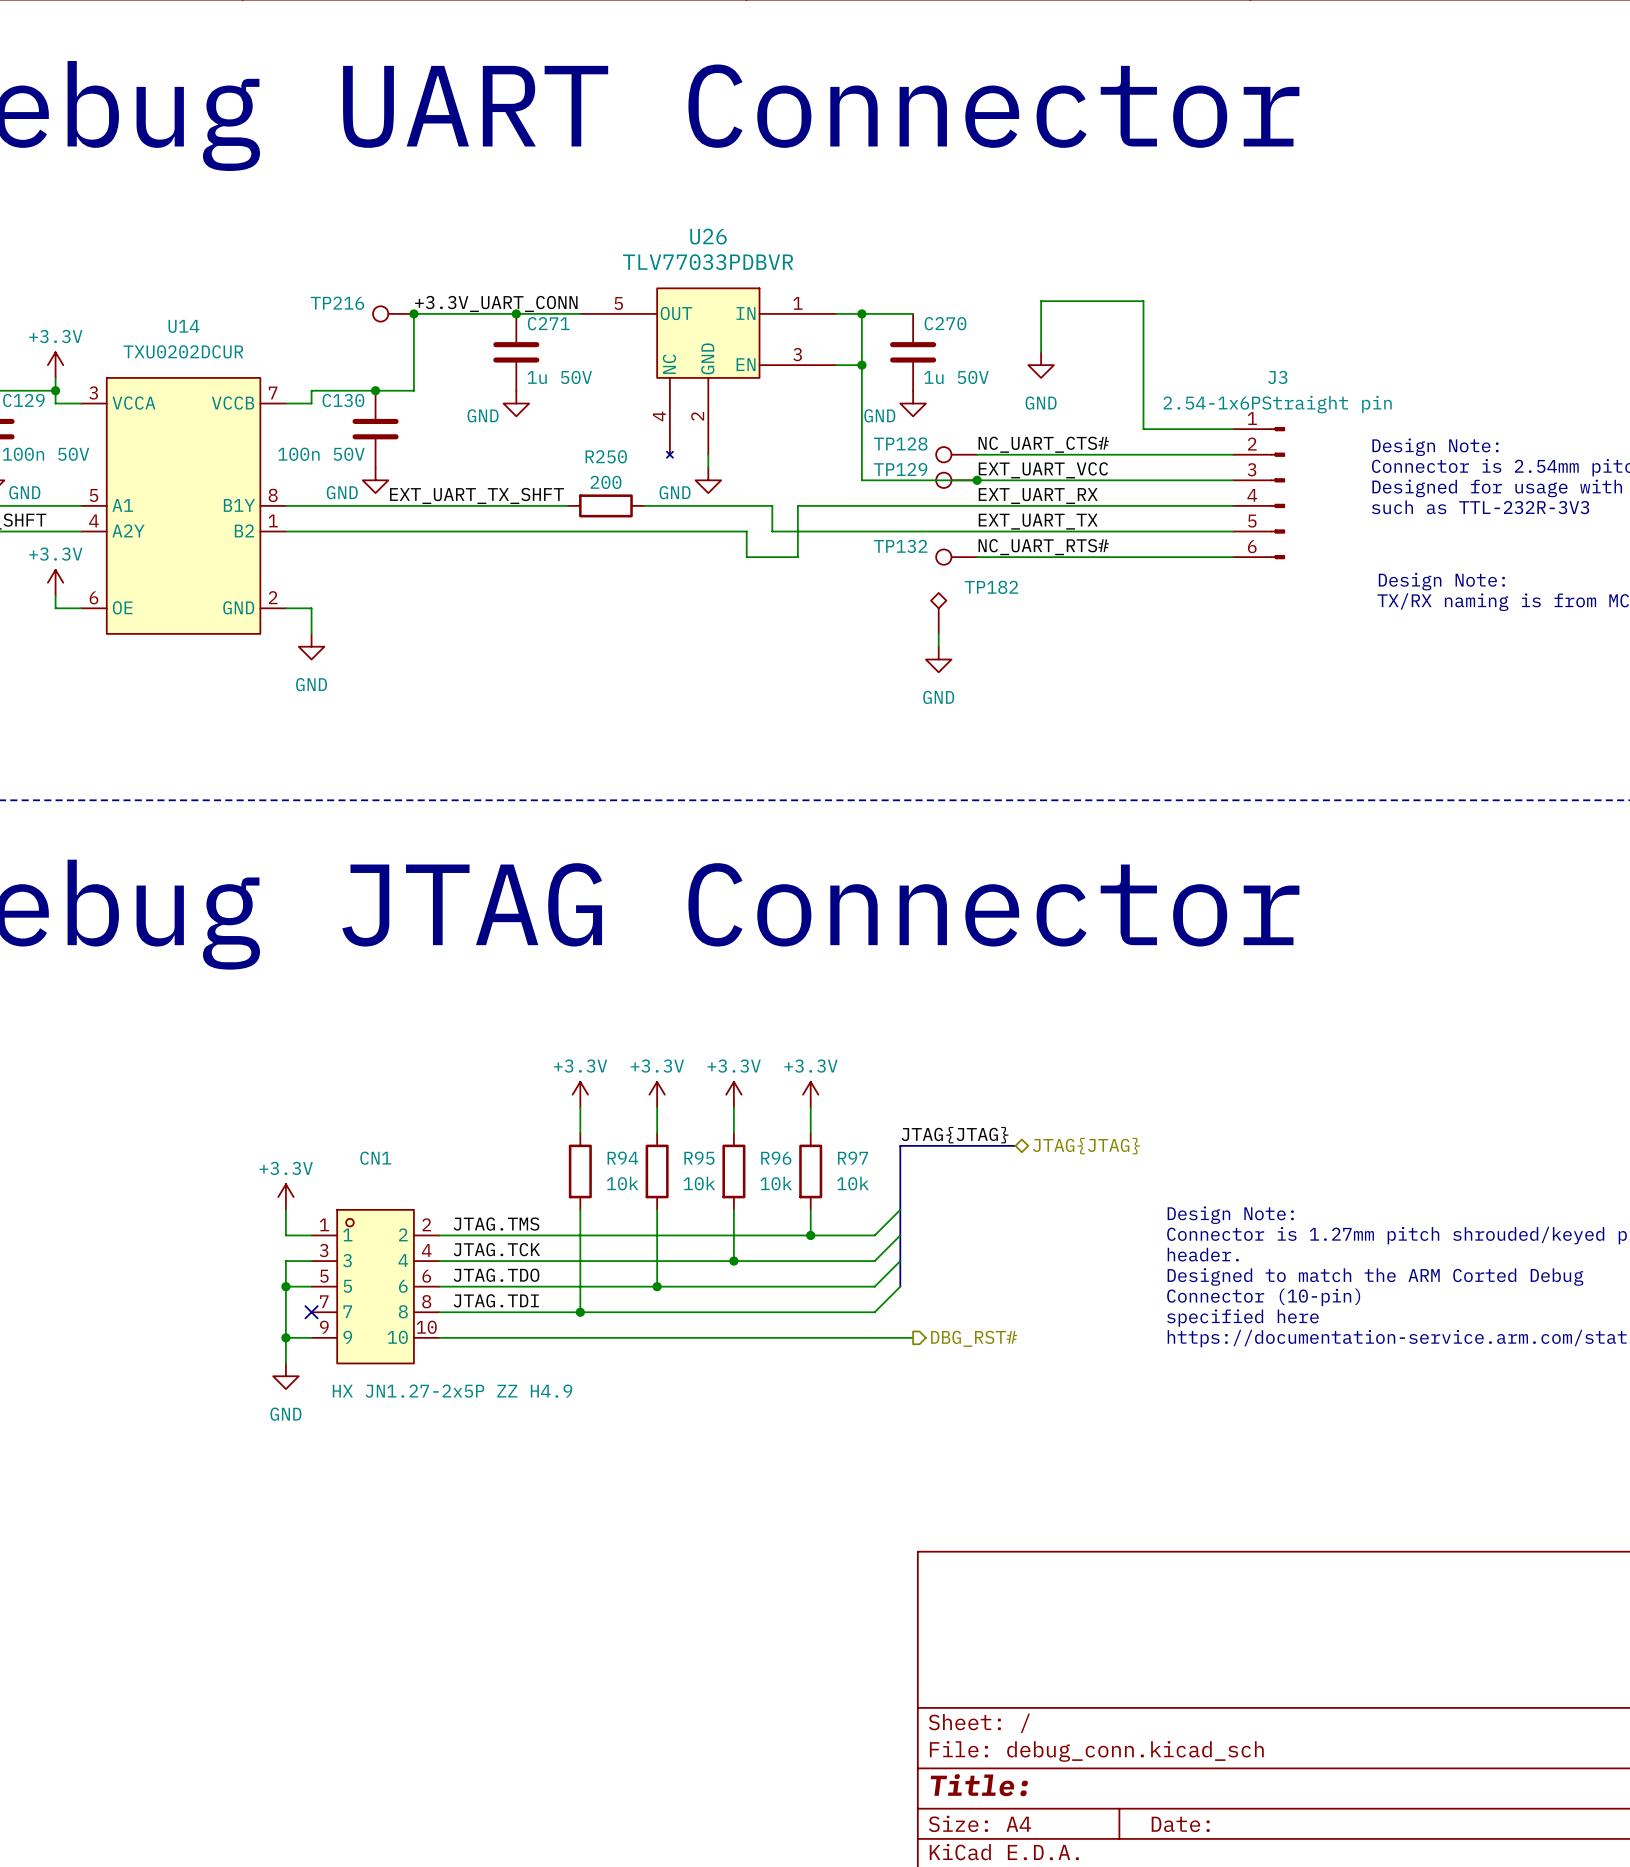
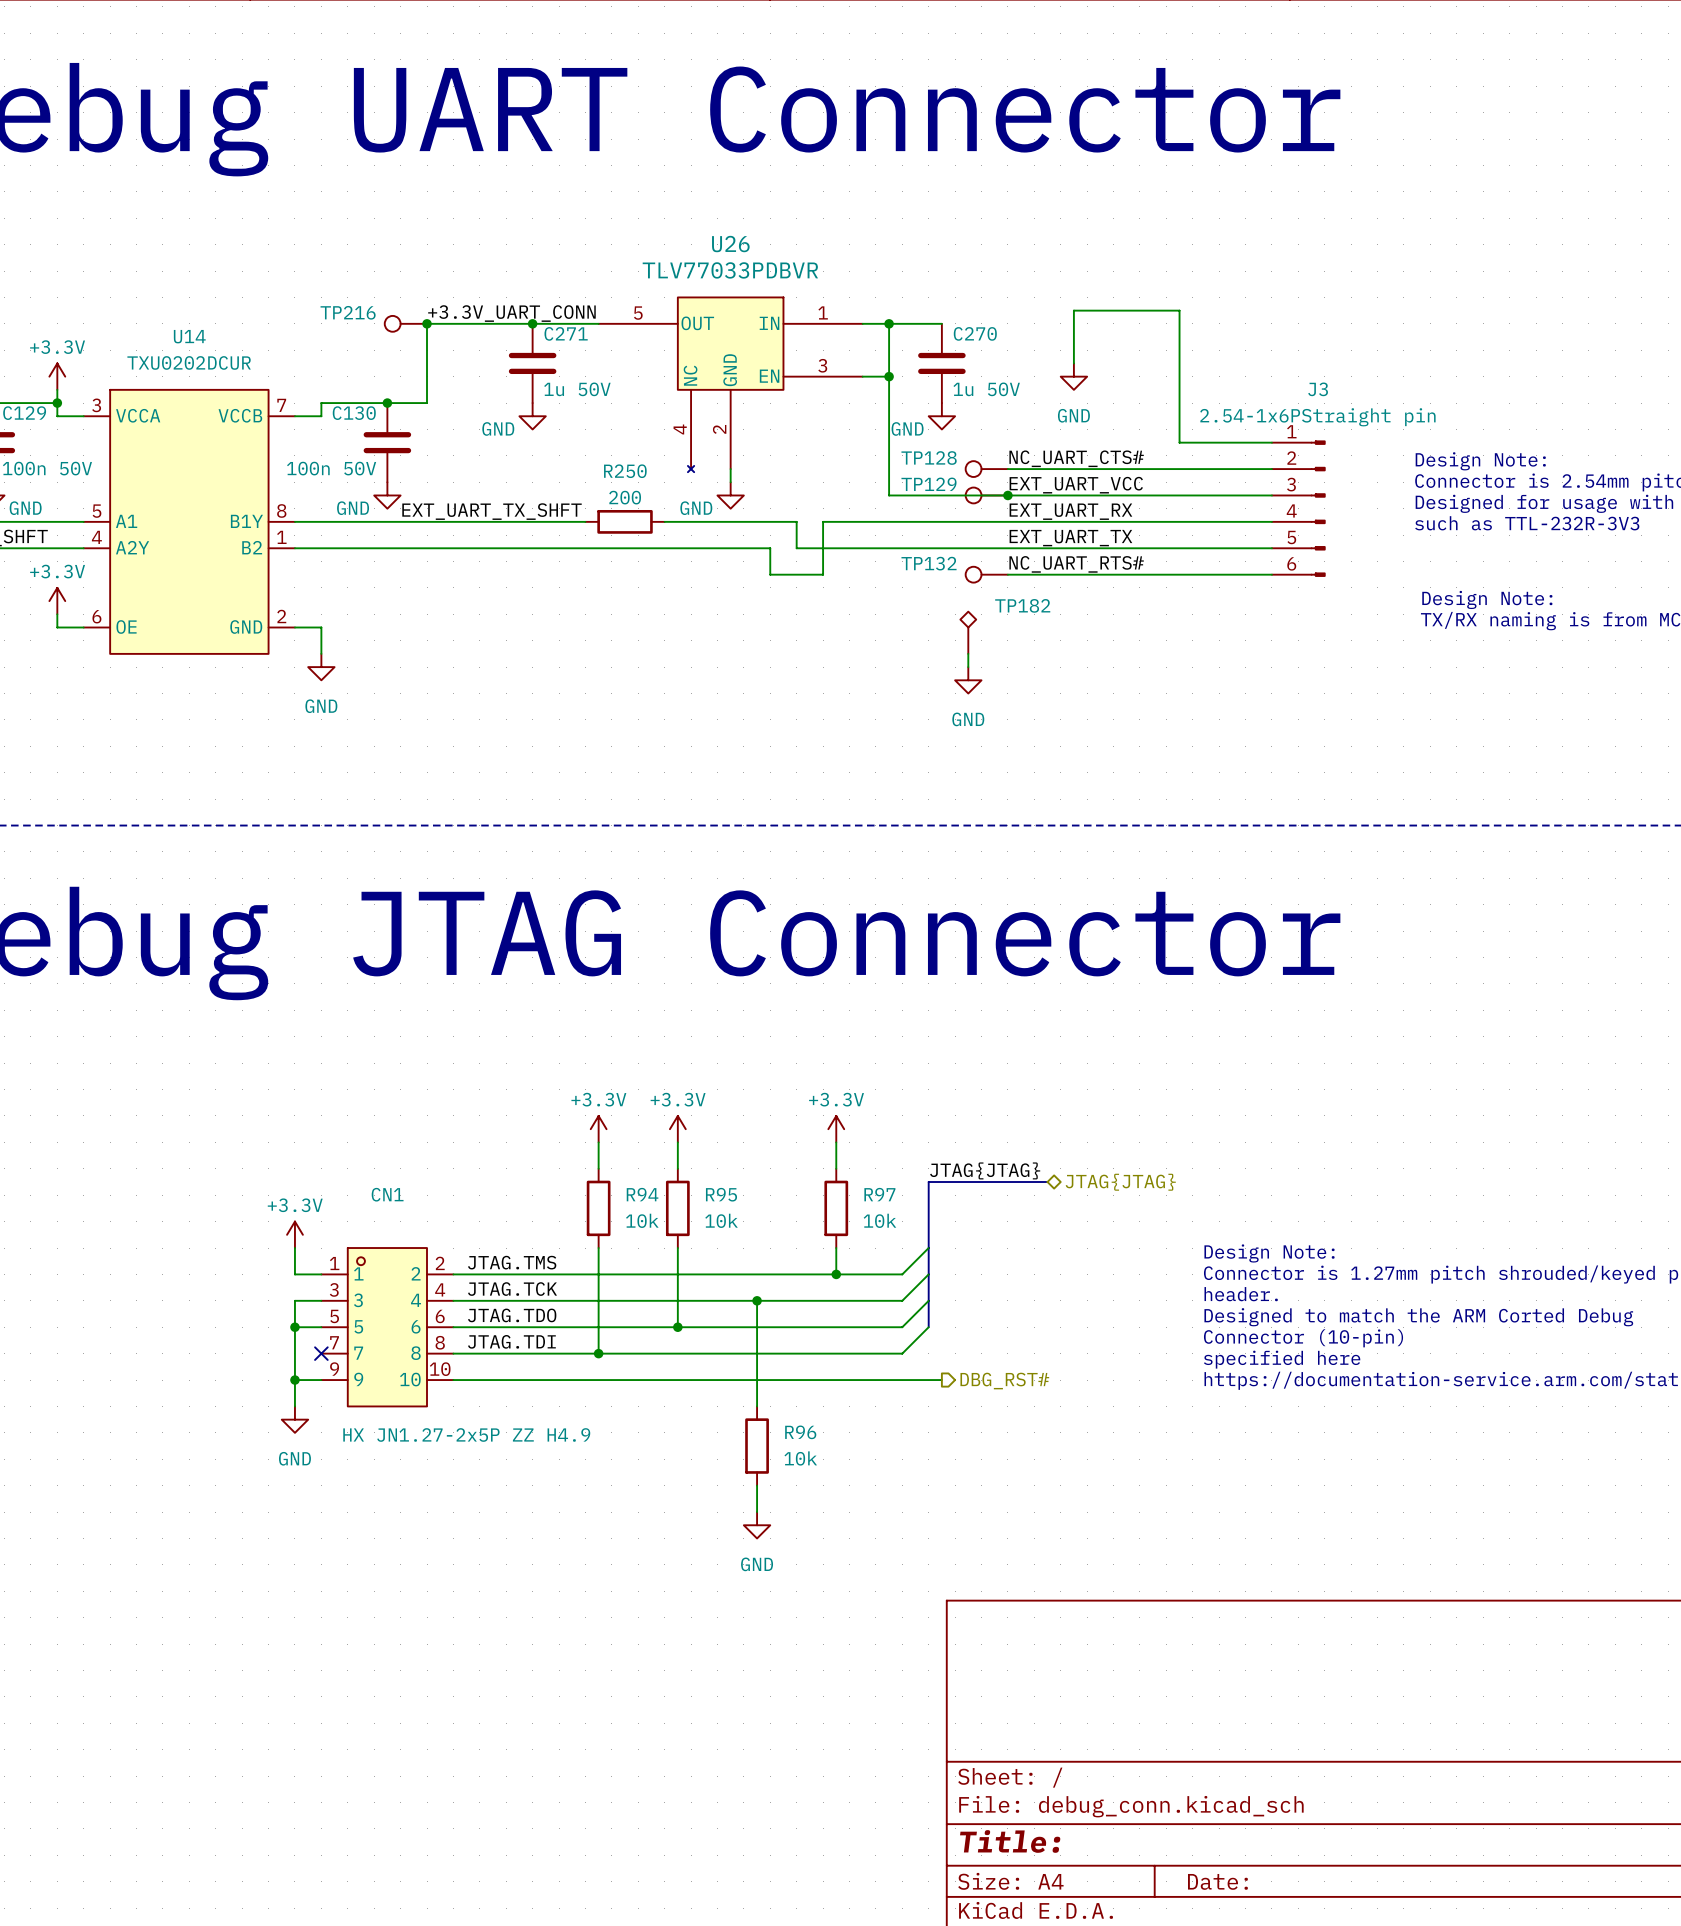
power symbol: +3.3V (733, 1094) -> none
wire: (733, 1107) (733, 1133) -> none
R96 position: (733, 1171) -> (757, 1446)
wire: (733, 1209) (733, 1261) -> (757, 1406) (757, 1300)
wire: none -> (757, 1485) (757, 1512)
power symbol: none -> GND (757, 1525)

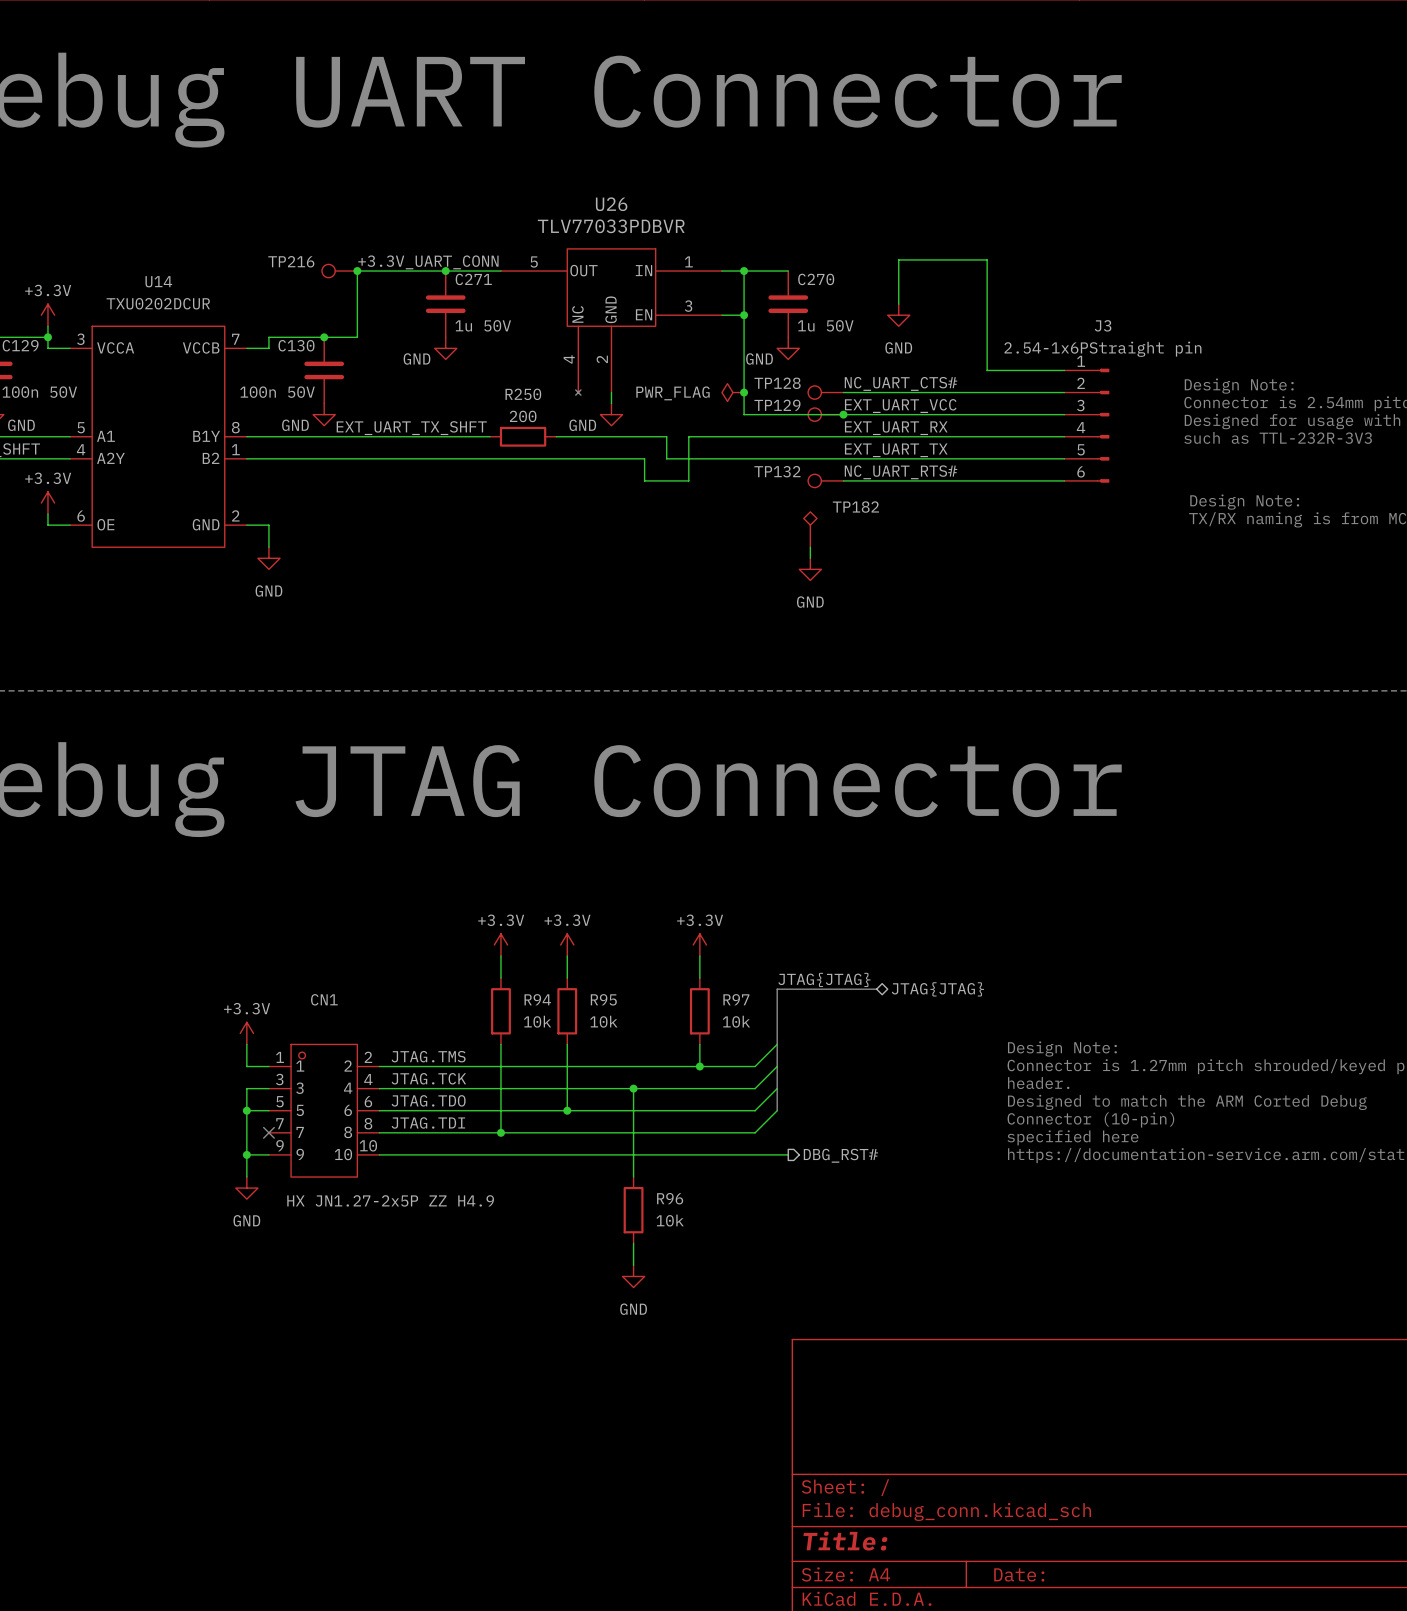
power symbol: none -> PWR_FLAG (733, 392)
junction: none -> (744, 392)

